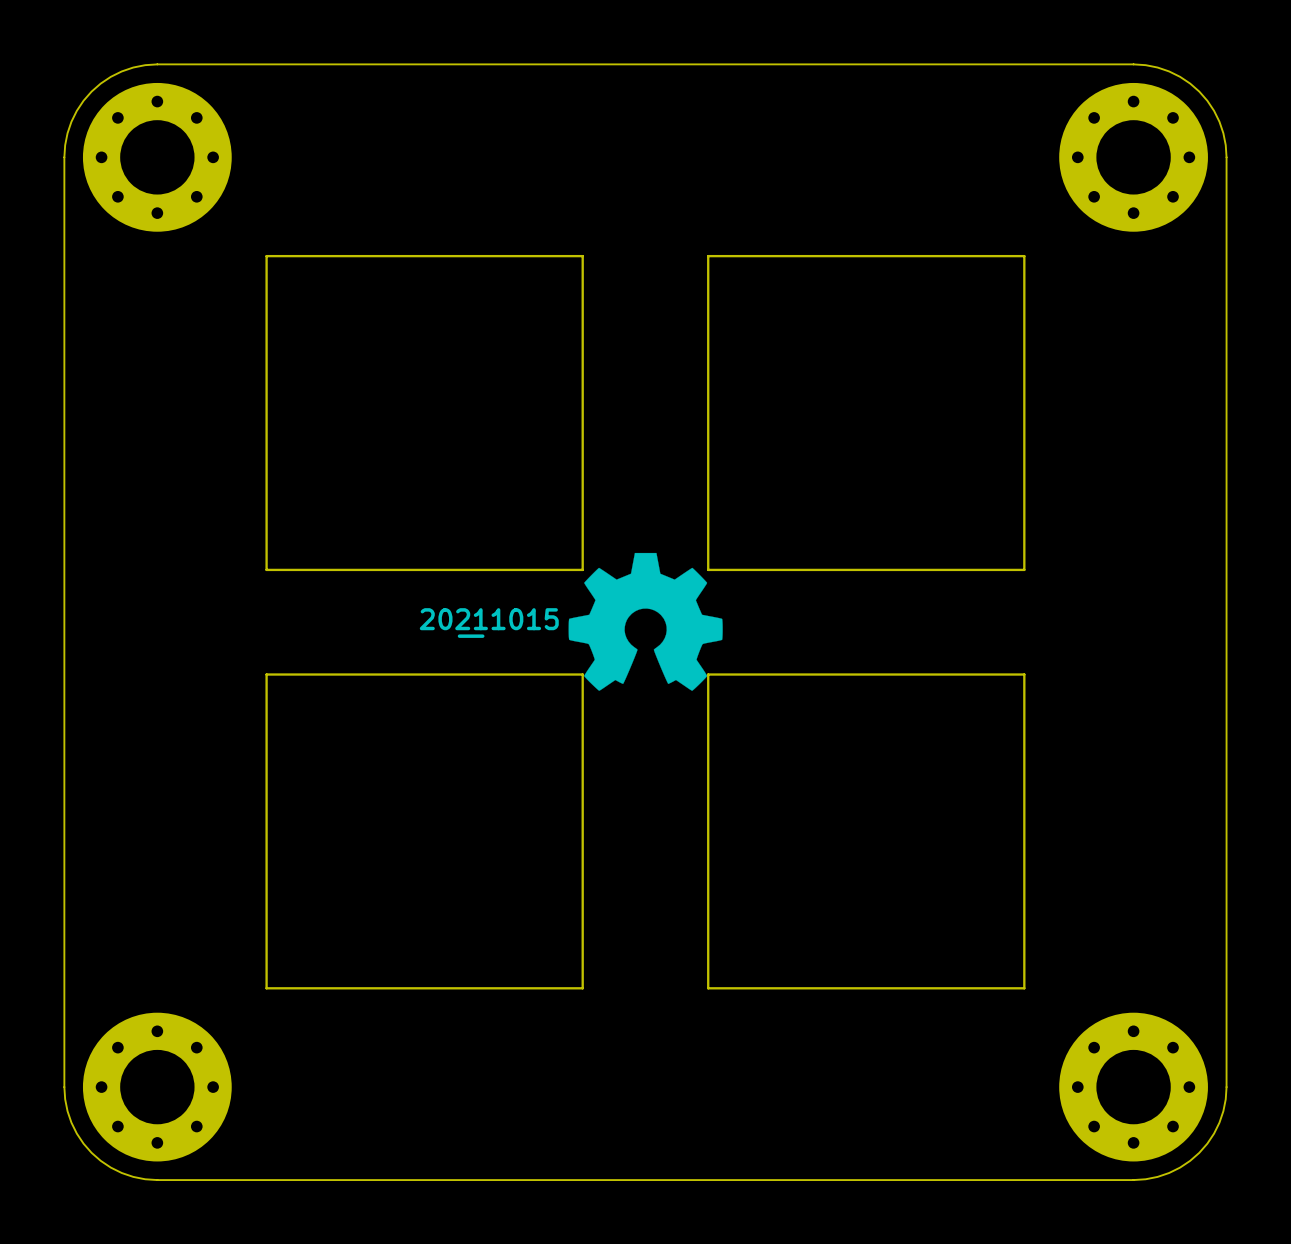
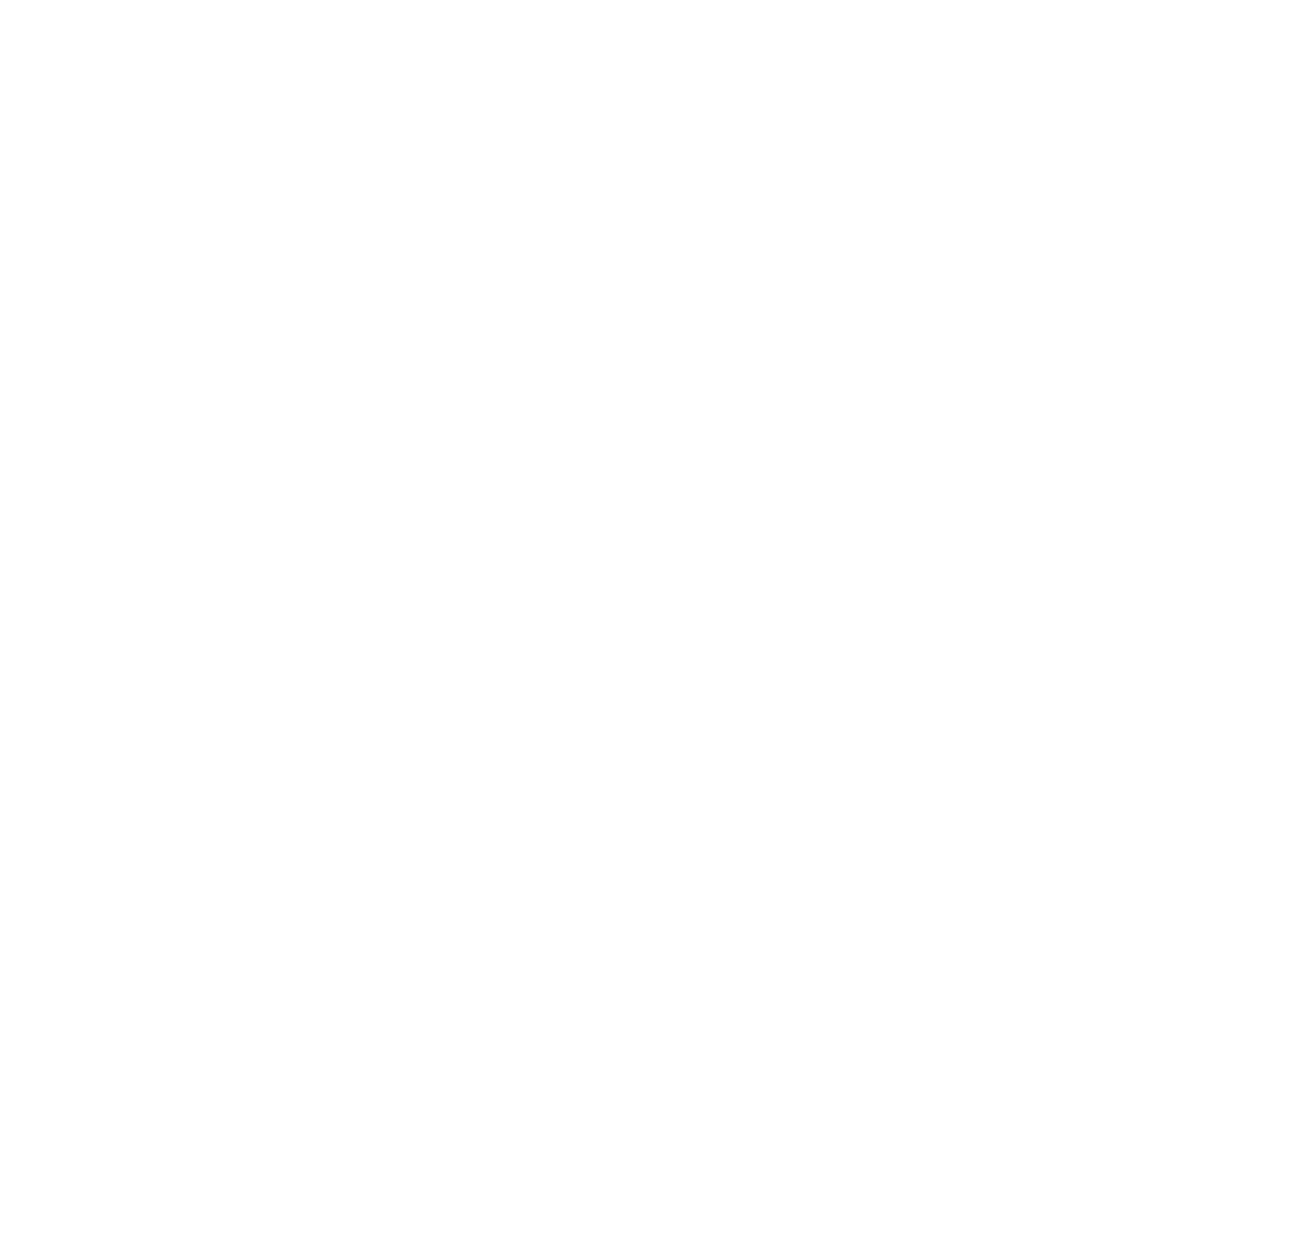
board edge: (1133, 64) (157, 64) (145, 65) (121, 71) (100, 83) (91, 91) (76, 110) (71, 121) (67, 133) (64, 157) (64, 1087) (67, 1111) (71, 1122) (76, 1133) (91, 1152) (100, 1160) (121, 1172) (133, 1176) (157, 1180) (1133, 1180) (1157, 1176) (1169, 1172) (1190, 1160) (1199, 1152) (1214, 1133) (1219, 1122) (1223, 1111) (1226, 1087) (1226, 157) (1223, 133) (1219, 121) (1214, 110) (1199, 91) (1190, 83) (1169, 71) (1145, 65) (1133, 64) -> none
part: (157, 157) -> none
part: (1133, 157) -> none
drawing: [265, 254, 1026, 990] -> none
part: (157, 1087) -> none
part: (1133, 1087) -> none

